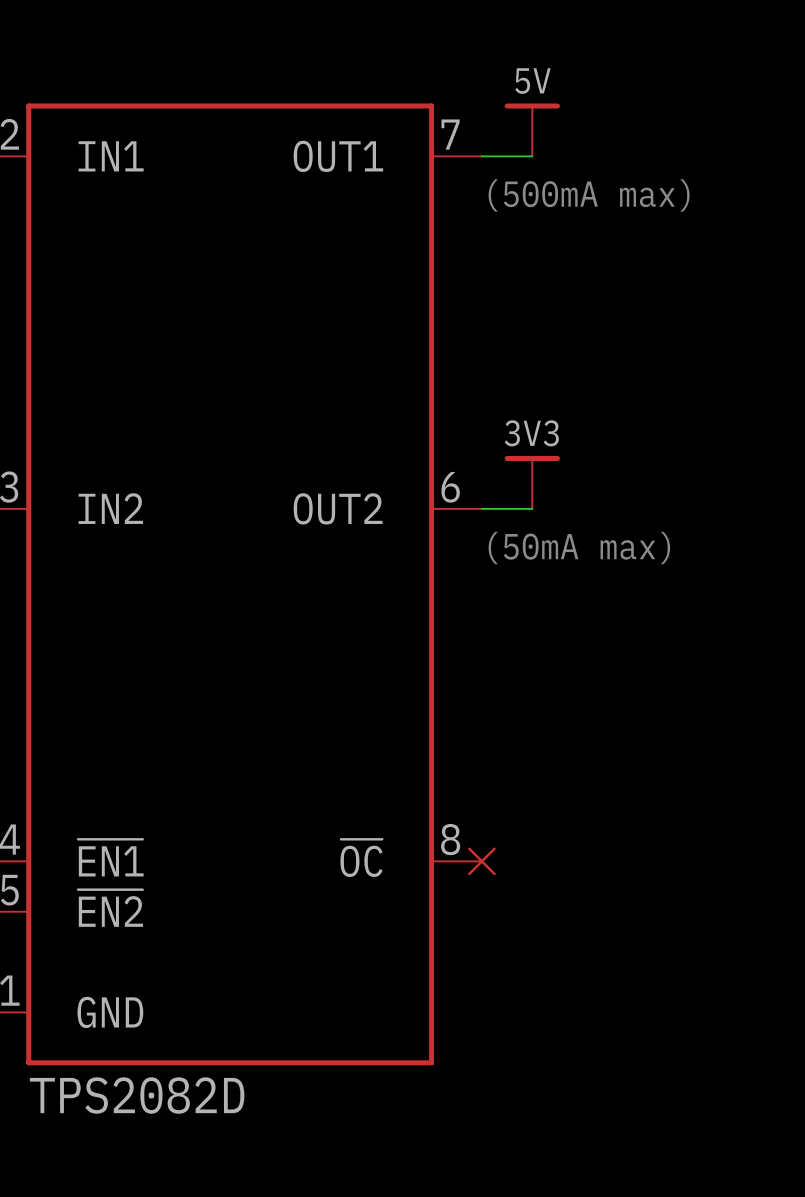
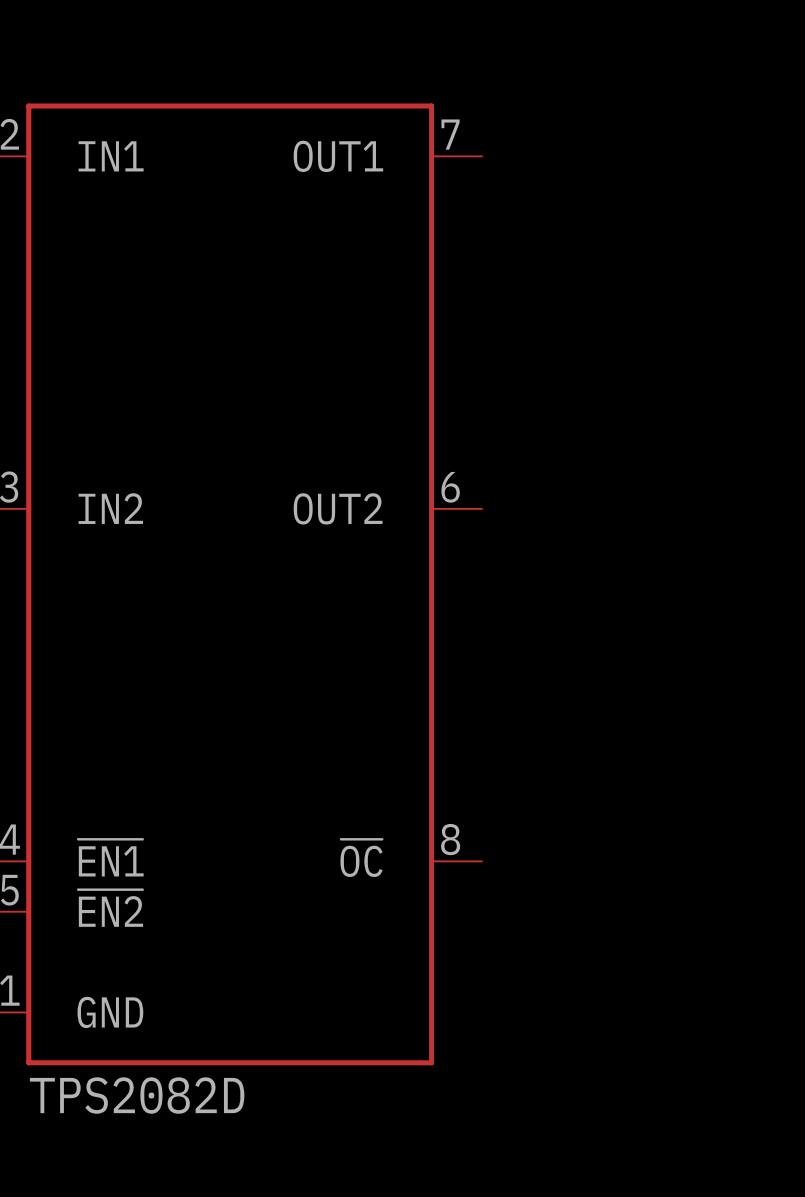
power symbol: 5V (532, 129) -> none
wire: (481, 156) (532, 156) -> none
text: (500mA max) (589, 195) -> none
power symbol: 3V3 (532, 482) -> none
wire: (481, 508) (532, 508) -> none
text: (50mA max) (579, 548) -> none
part: (481, 861) -> none

